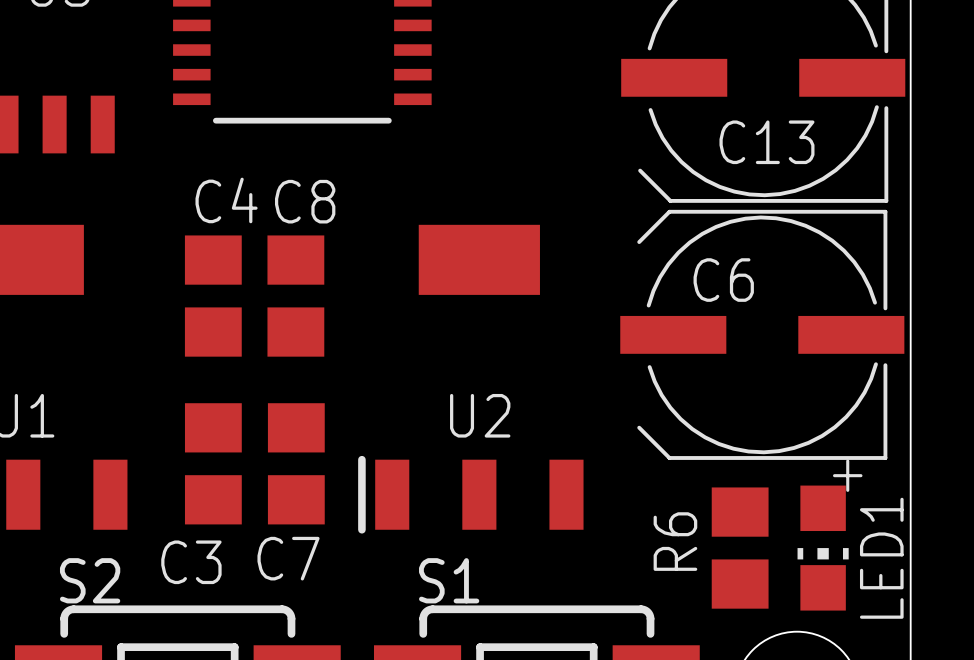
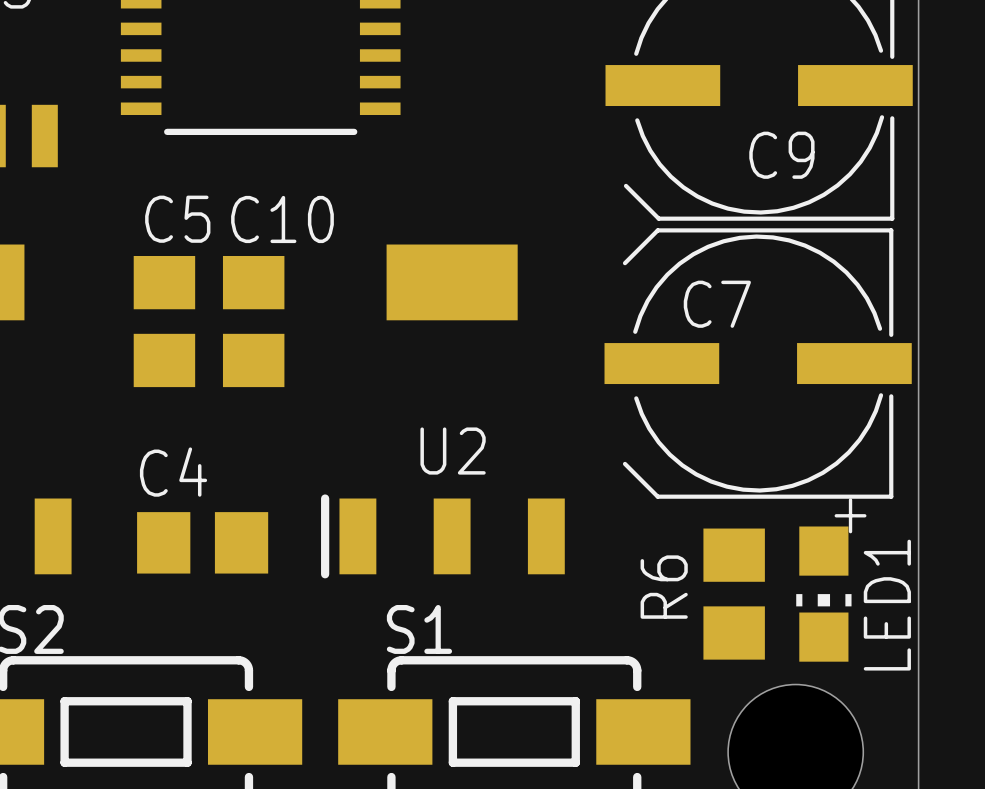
C13 name: C13 (766, 142) -> C9 (781, 155)
C4 name: C4 (226, 200) -> C5 (177, 219)
C8 name: C8 (305, 201) -> C10 (282, 219)
C6 name: C6 (723, 280) -> C7 (717, 304)
C3: (213, 463) -> none
C7: (296, 463) -> none
C4: none -> (202, 542)

